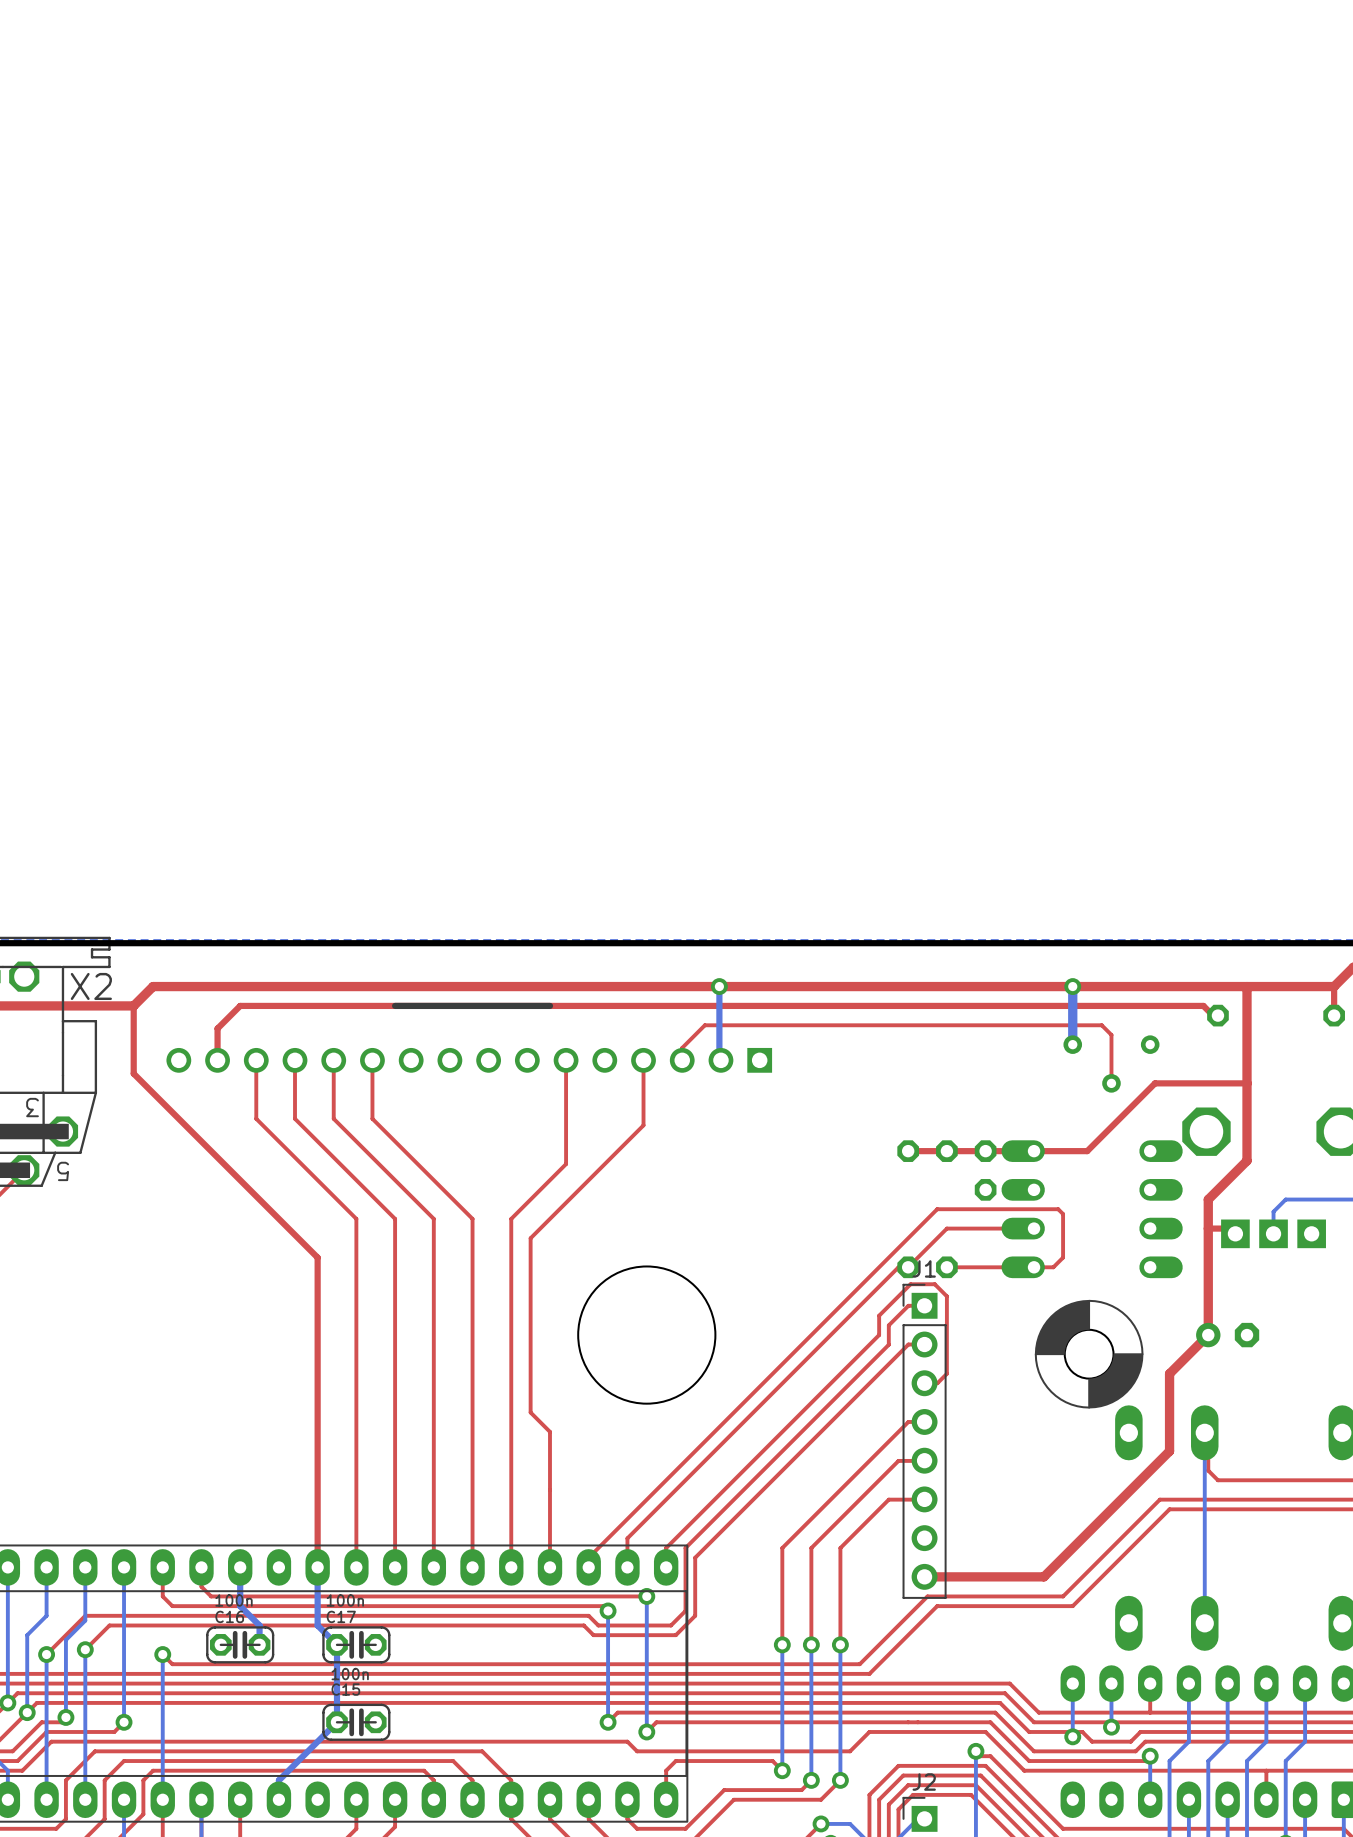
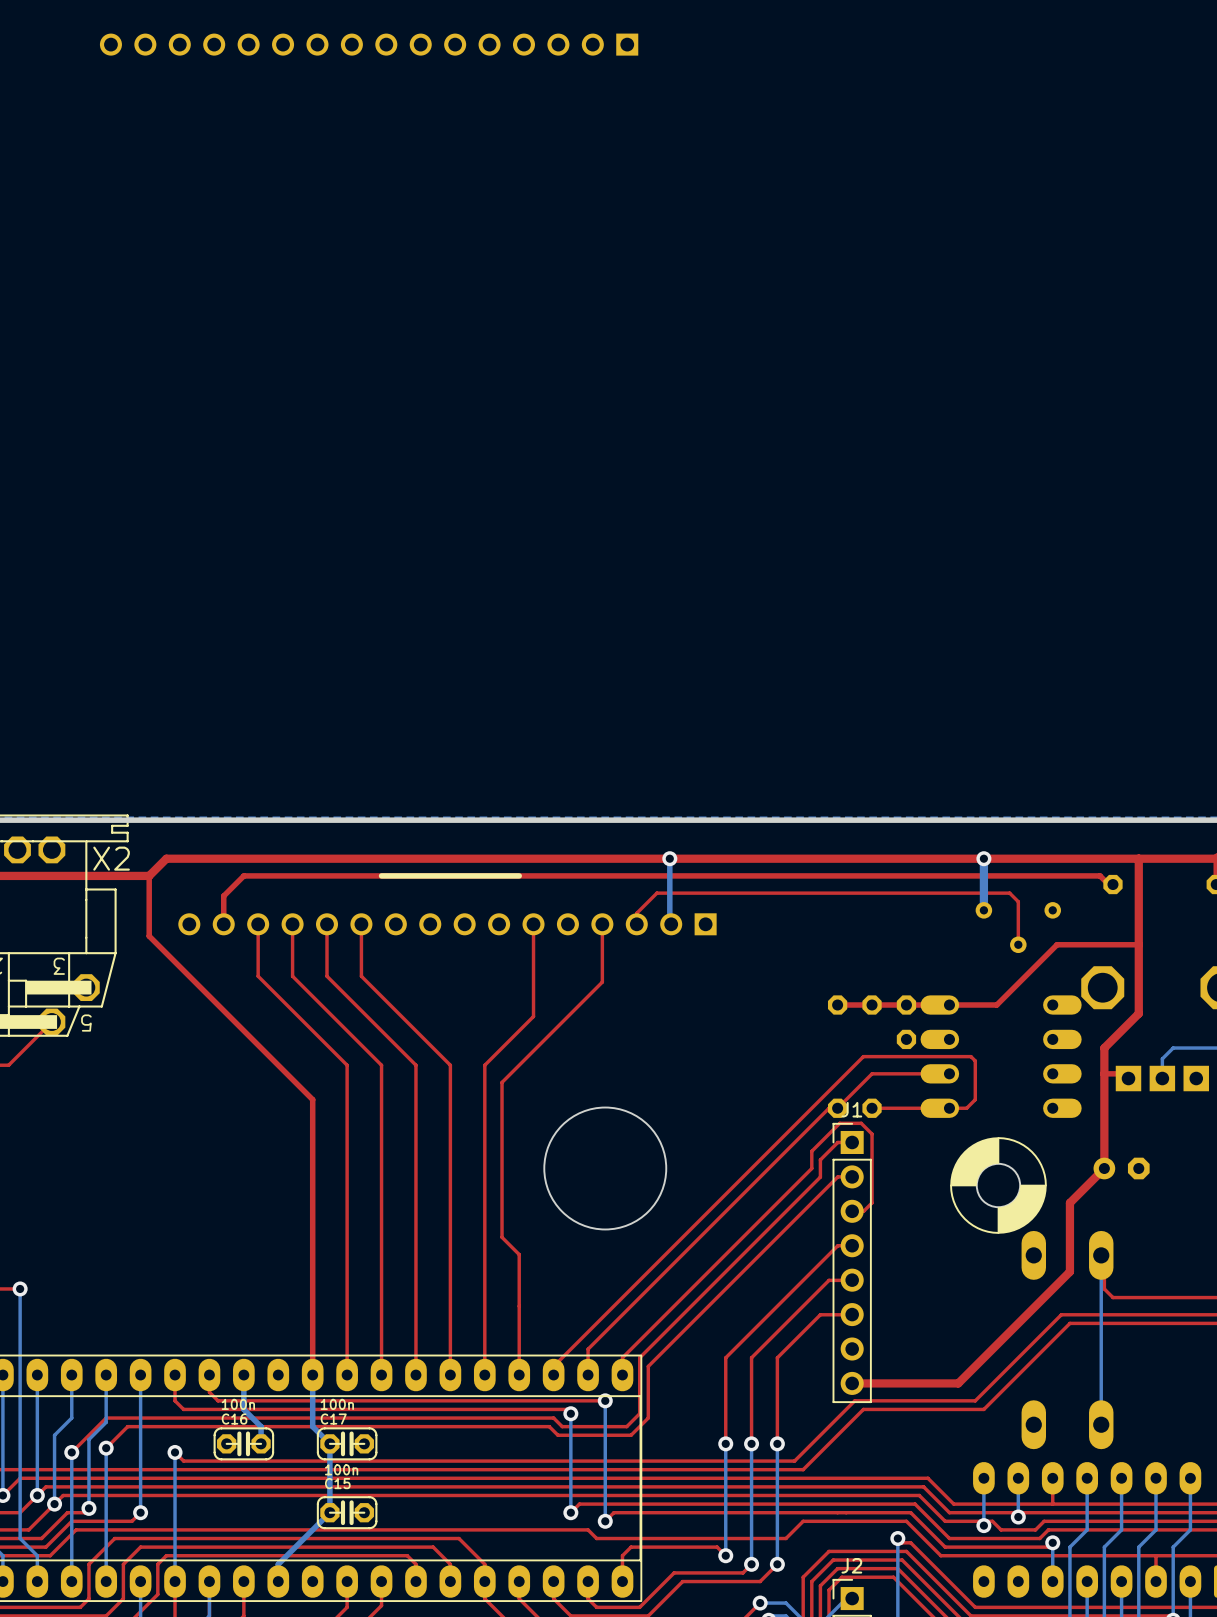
part: none -> (369, 44)

